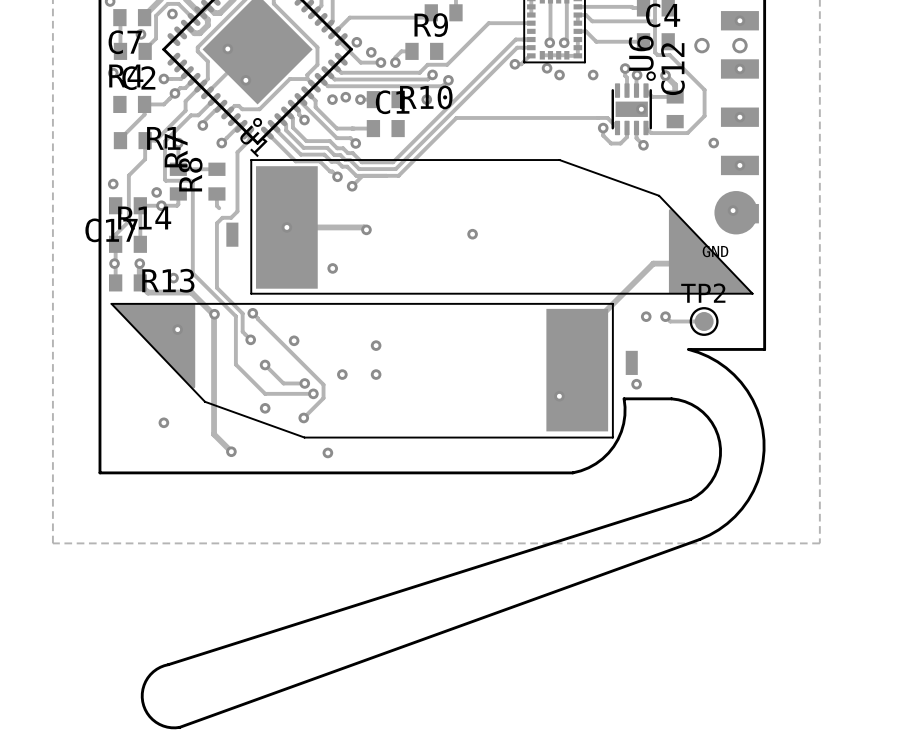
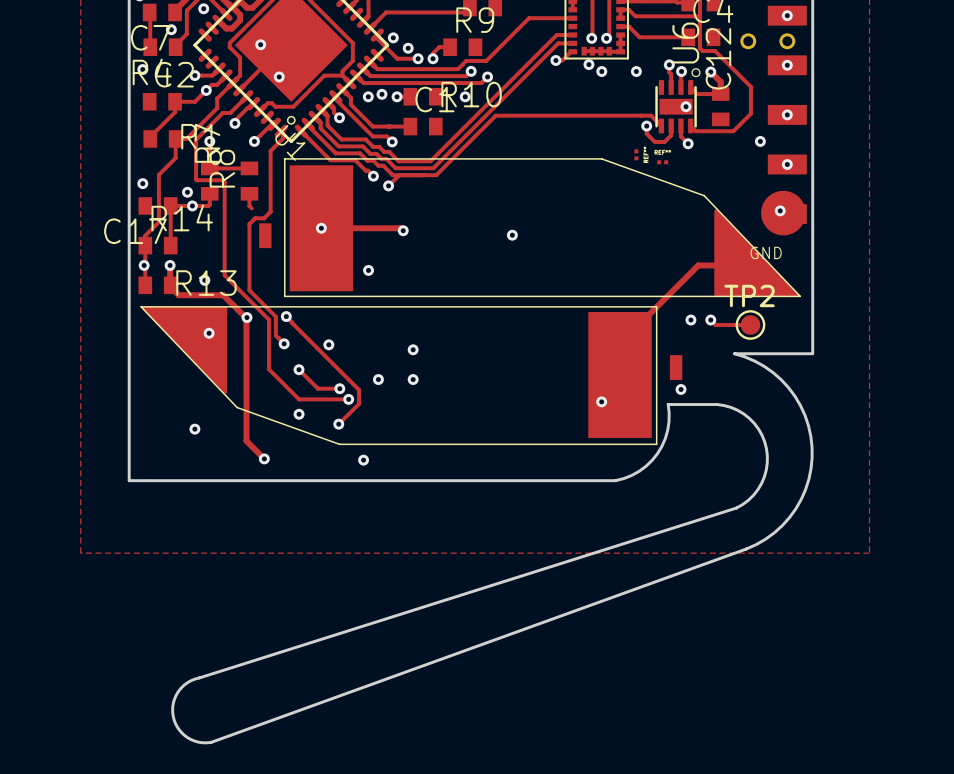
part: none -> (636, 154)
part: none -> (662, 162)

